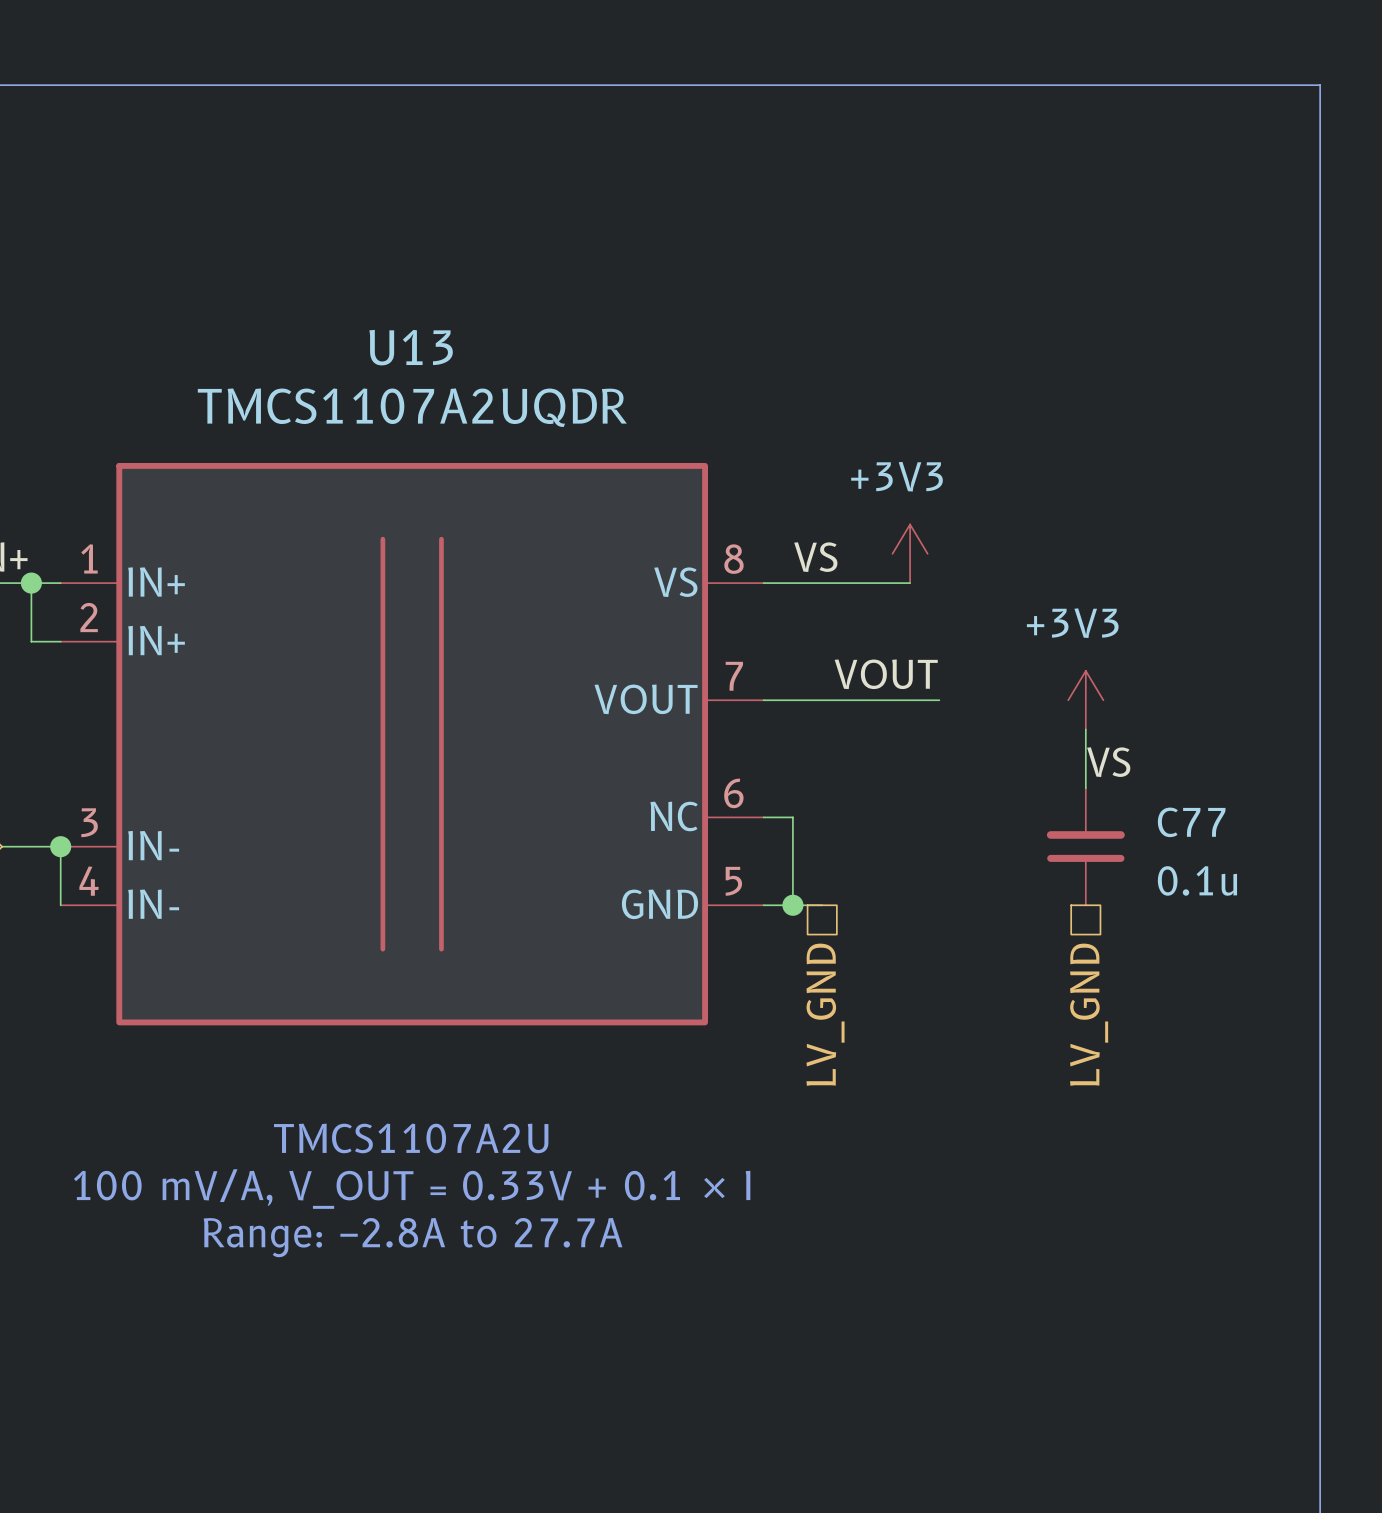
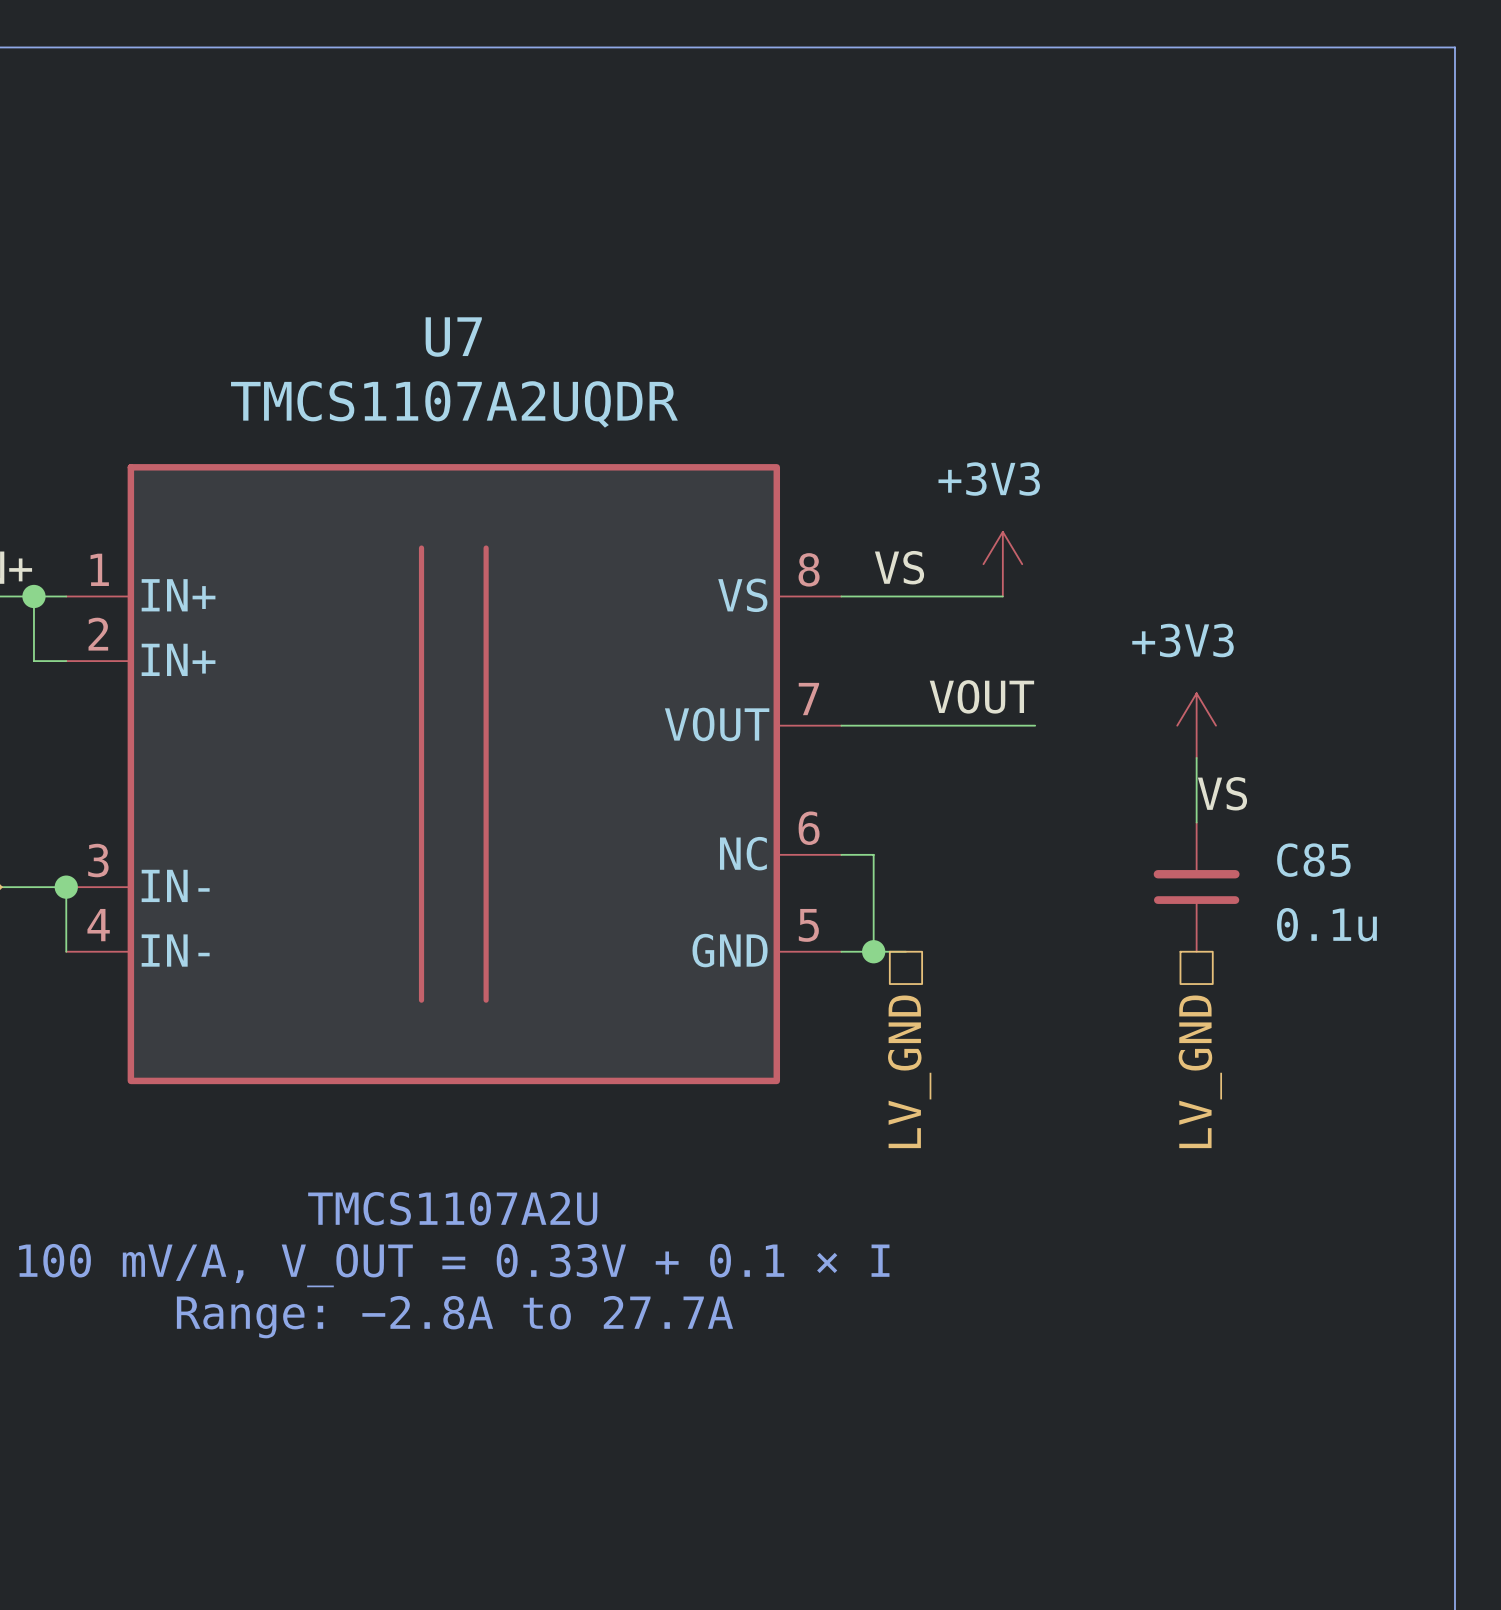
U13 name: U13 (411, 347) -> U7 (453, 337)
C77 name: C77 (1191, 822) -> C85 (1313, 860)

